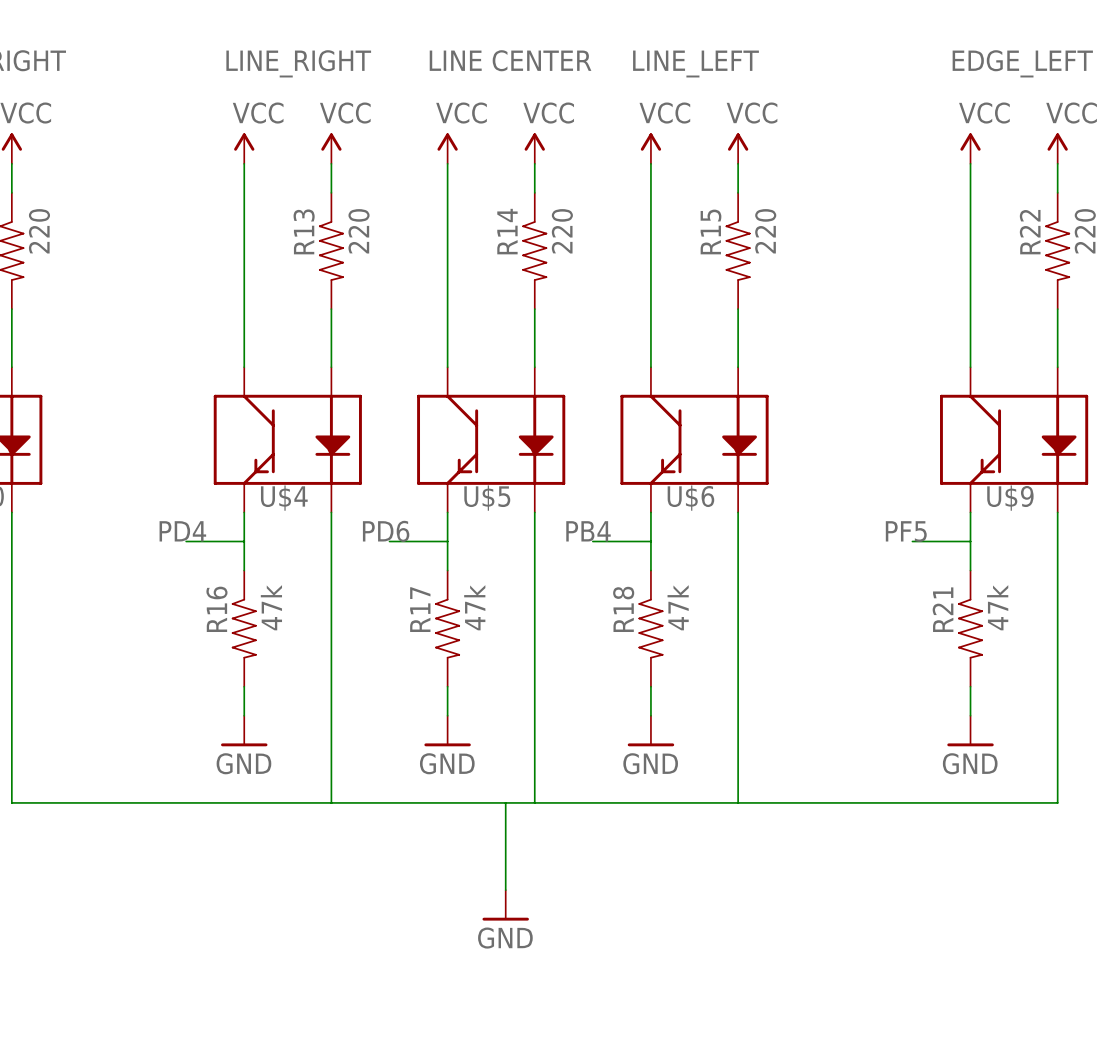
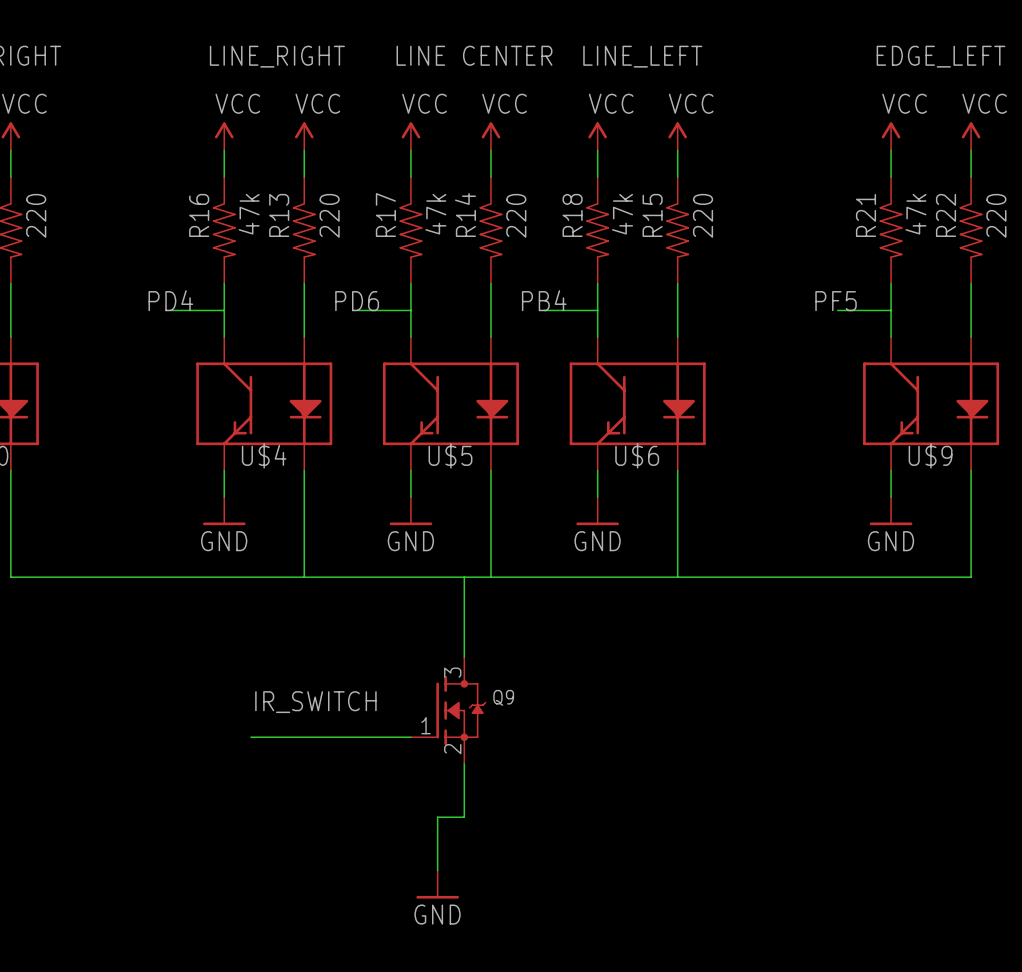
wire: none -> (170, 310) (224, 310)
wire: none -> (357, 310) (410, 310)
wire: none -> (544, 310) (597, 310)
wire: none -> (837, 310) (891, 310)
label position: PD4 (182, 531) -> PD4 (170, 300)
label position: PD6 (386, 531) -> PD6 (357, 301)
label position: PB4 (588, 531) -> PB4 (544, 300)
label position: PF5 (906, 531) -> PF5 (836, 301)
wire: (186, 541) (244, 541) (244, 570) -> none
wire: (389, 541) (447, 541) (447, 570) -> none
wire: (592, 541) (650, 541) (650, 570) -> none
wire: (912, 541) (970, 541) (970, 570) -> none
power symbol: none -> GND (224, 511)
power symbol: none -> GND (410, 511)
power symbol: none -> GND (597, 511)
wire: (11, 628) (11, 802) (273, 802) -> none
R16 position: (244, 628) -> (224, 230)
wire: (331, 628) (331, 802) -> none
R17 position: (447, 628) -> (410, 230)
wire: none -> (464, 577) (464, 657)
wire: (534, 628) (534, 802) -> none
R18 position: (650, 628) -> (597, 230)
wire: (738, 628) (738, 802) -> none
R21 position: (970, 628) -> (891, 230)
wire: (1057, 628) (1057, 802) (447, 802) -> (971, 577) (10, 577)
wire: (244, 686) (244, 715) -> none
wire: (447, 686) (447, 715) -> none
wire: (650, 686) (650, 715) -> none
wire: (970, 686) (970, 715) -> none
power symbol: GND (244, 731) -> none
power symbol: GND (447, 731) -> none
power symbol: GND (650, 731) -> none
power symbol position: GND (970, 731) -> GND (891, 511)
label: none -> IR_SWITCH (315, 702)
Q9: none -> (448, 710)
wire: none -> (464, 817) (437, 817) (437, 870)
power symbol position: GND (505, 905) -> GND (437, 884)

